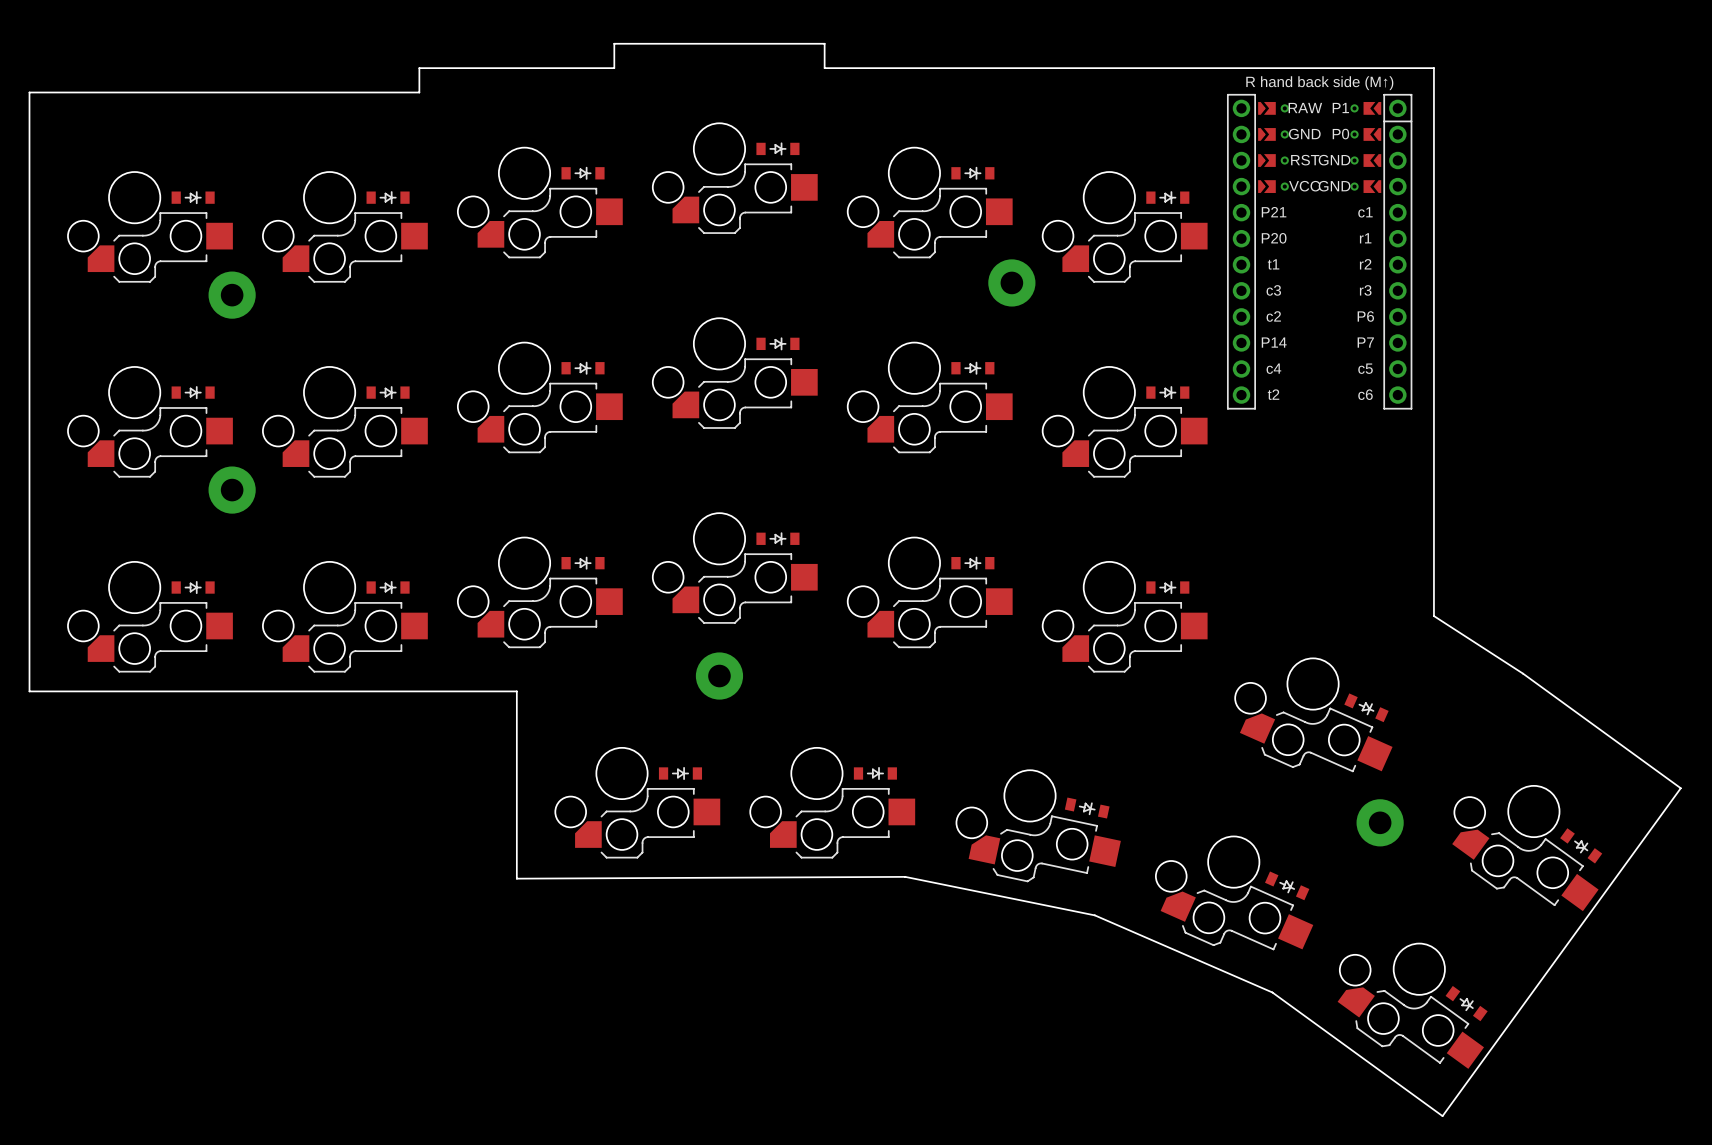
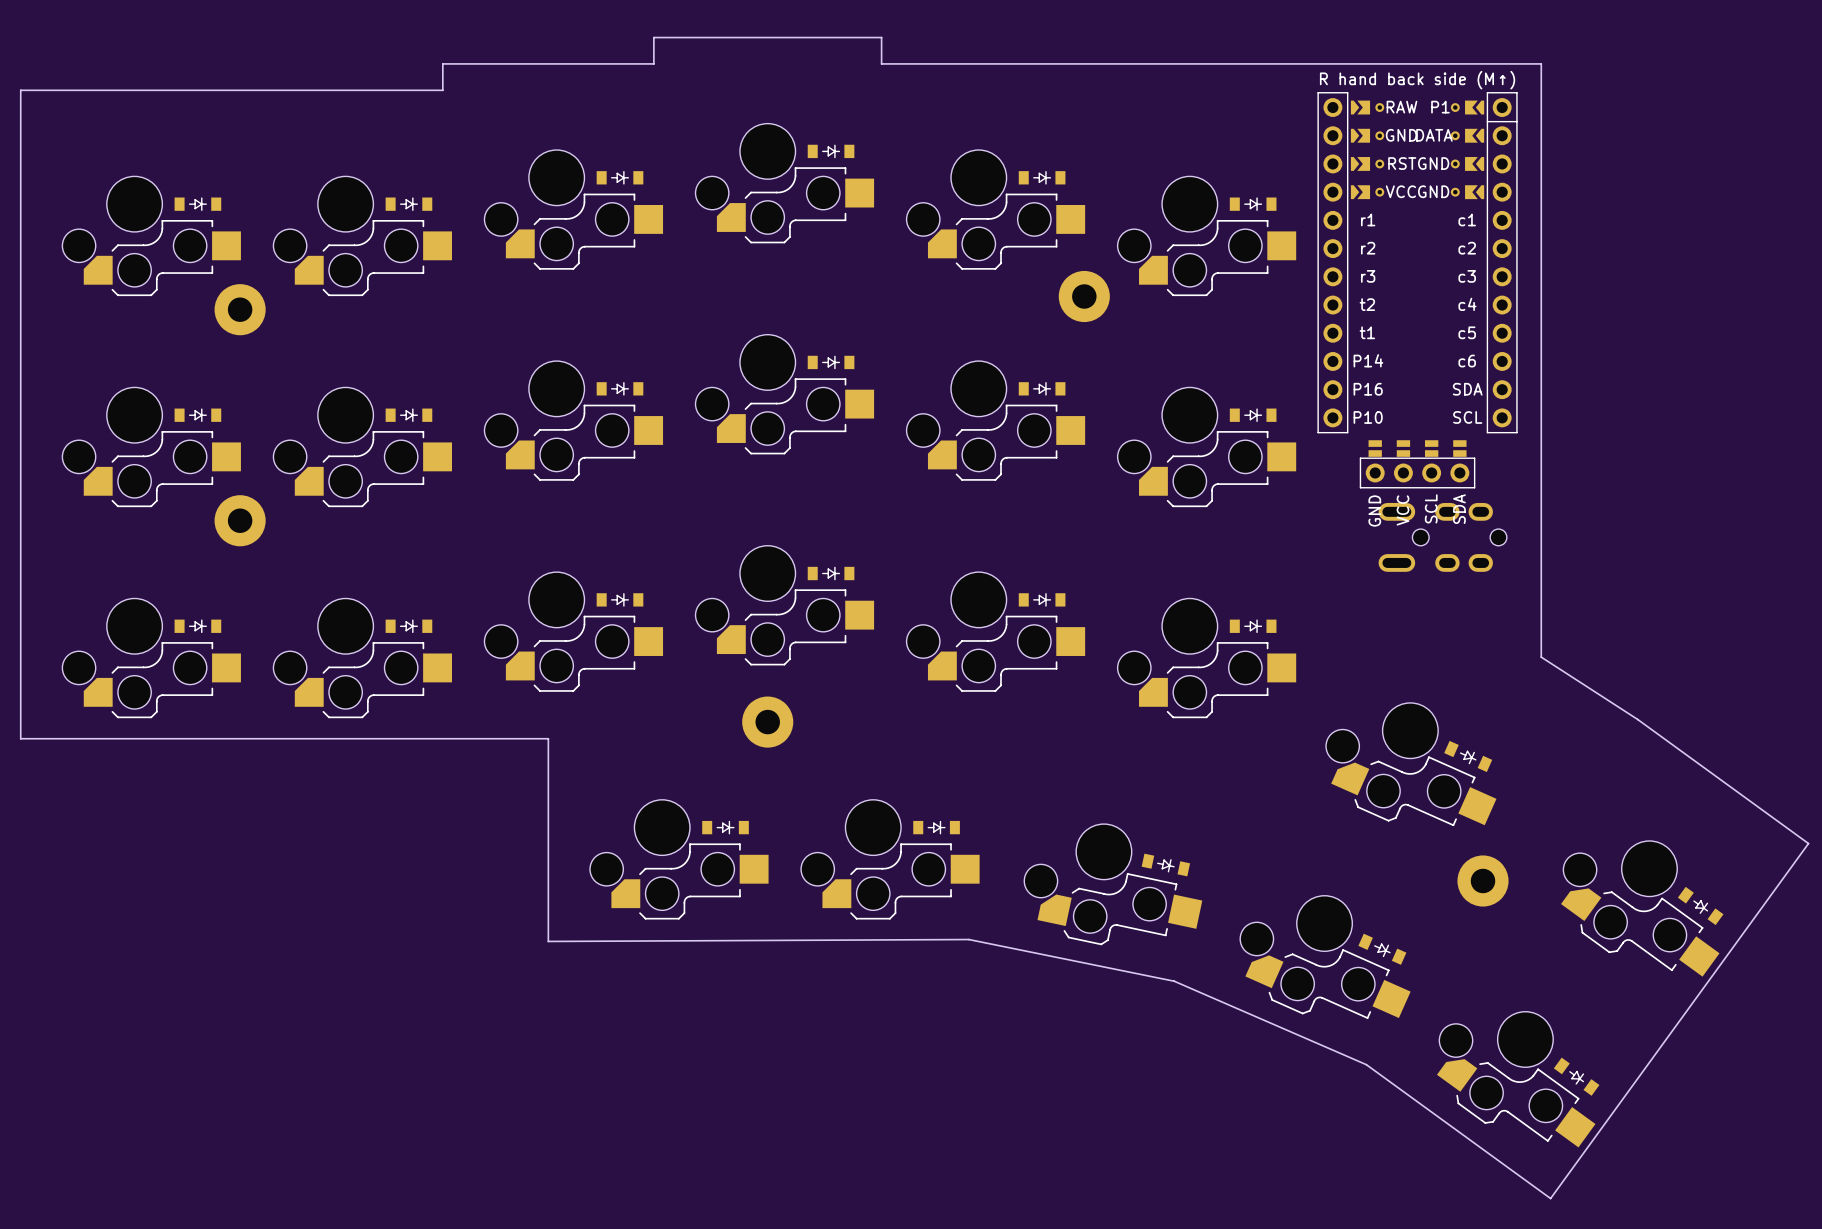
part footprint: [1227, 94, 1413, 410] -> [1317, 92, 1518, 434]
part: none -> (1417, 464)
part: none -> (1442, 537)

